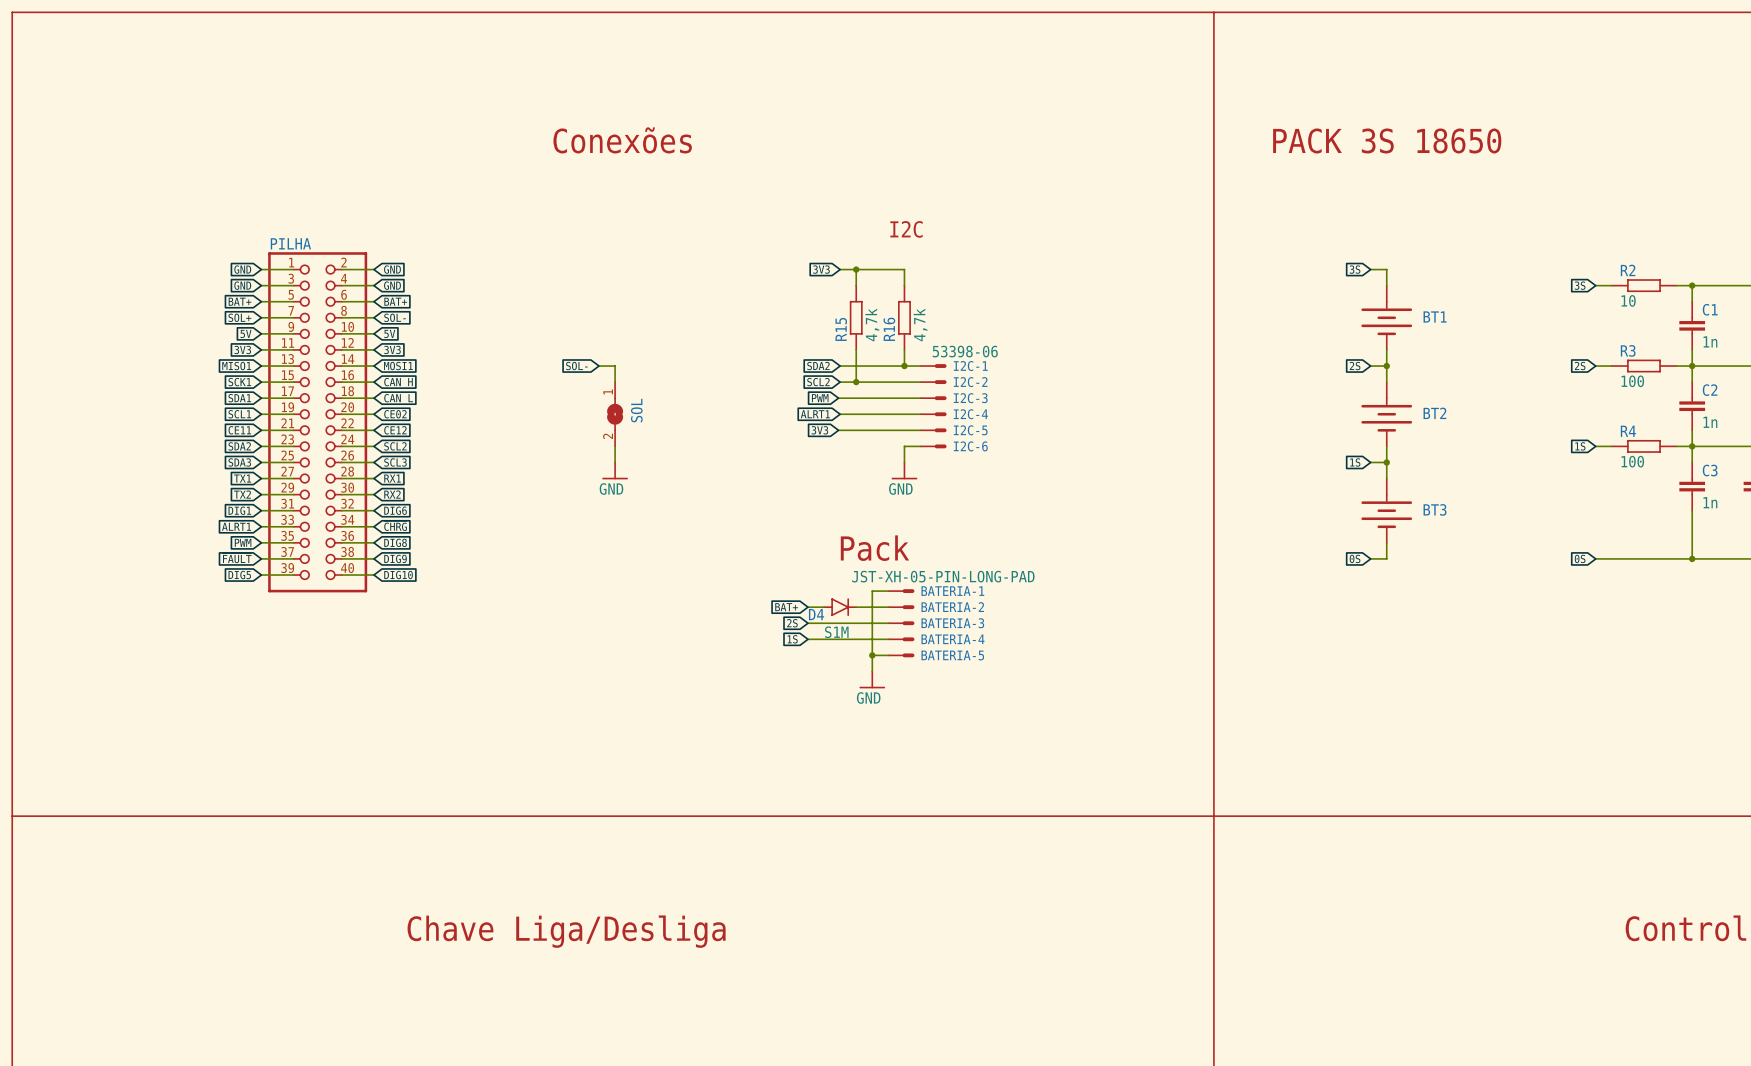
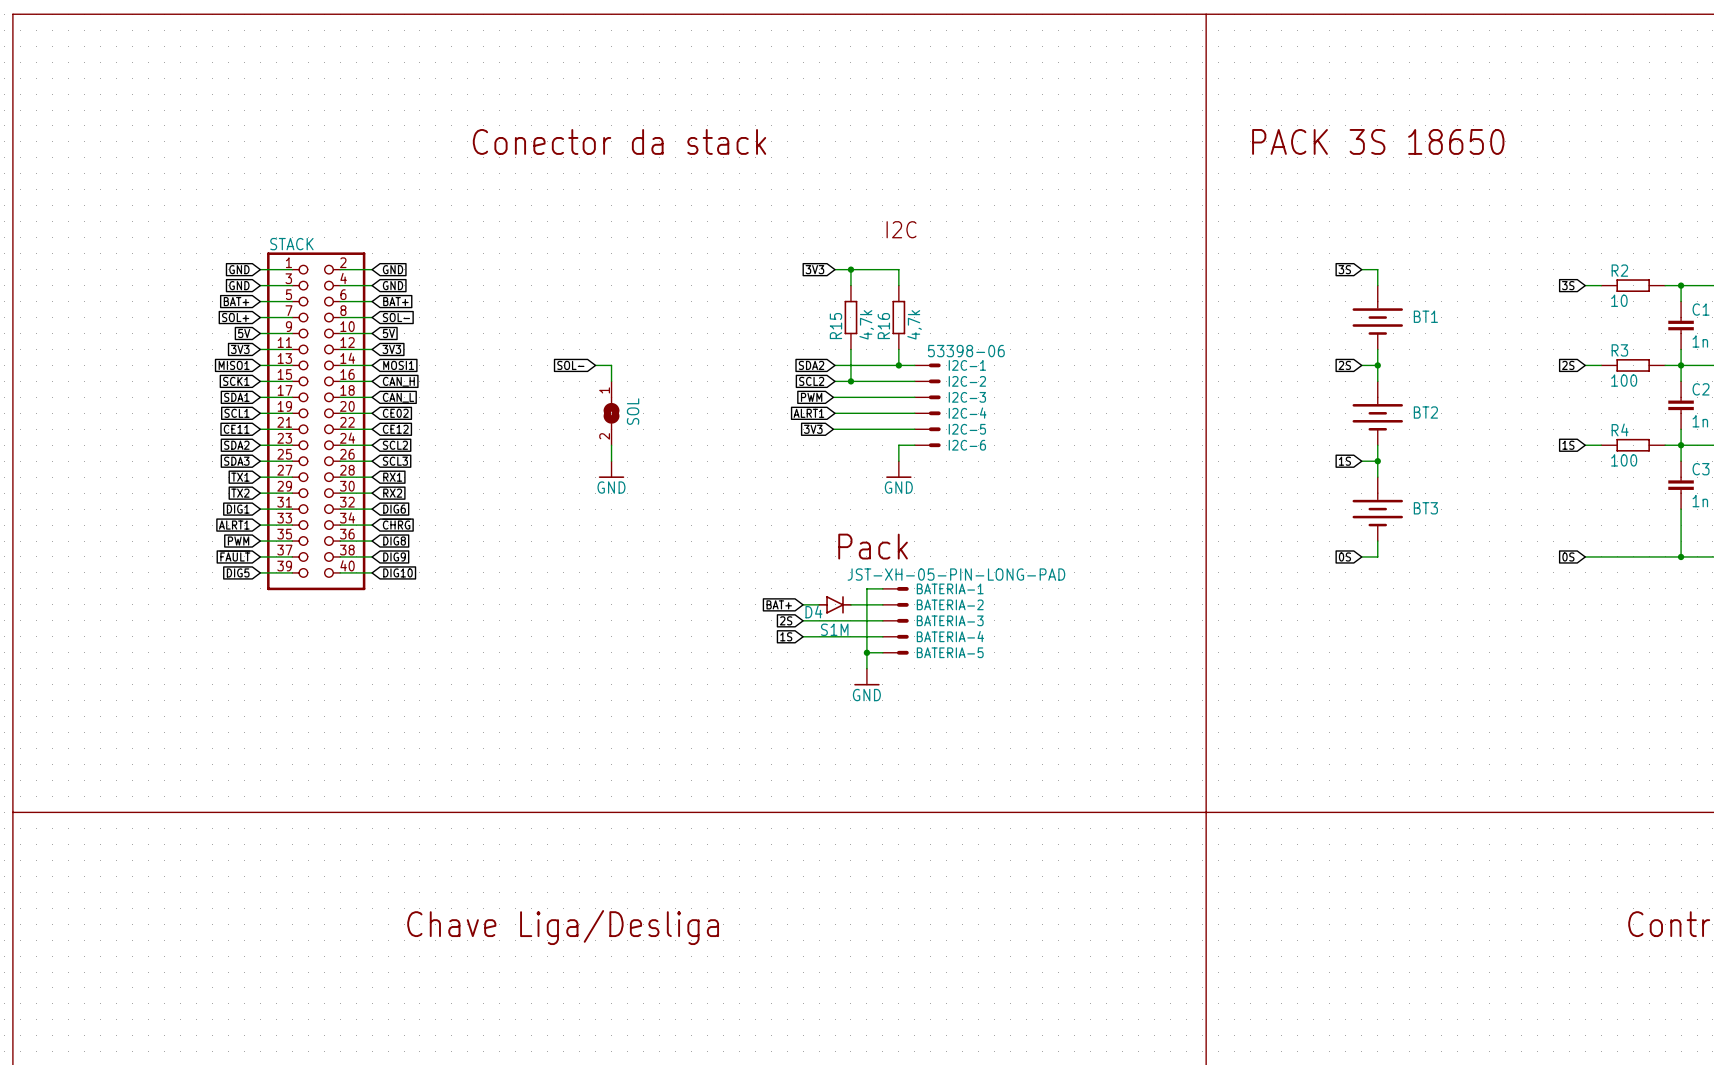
text: Conexões (622, 140) -> Conector da stack (619, 141)
PILHA name: PILHA (290, 243) -> STACK (291, 244)

